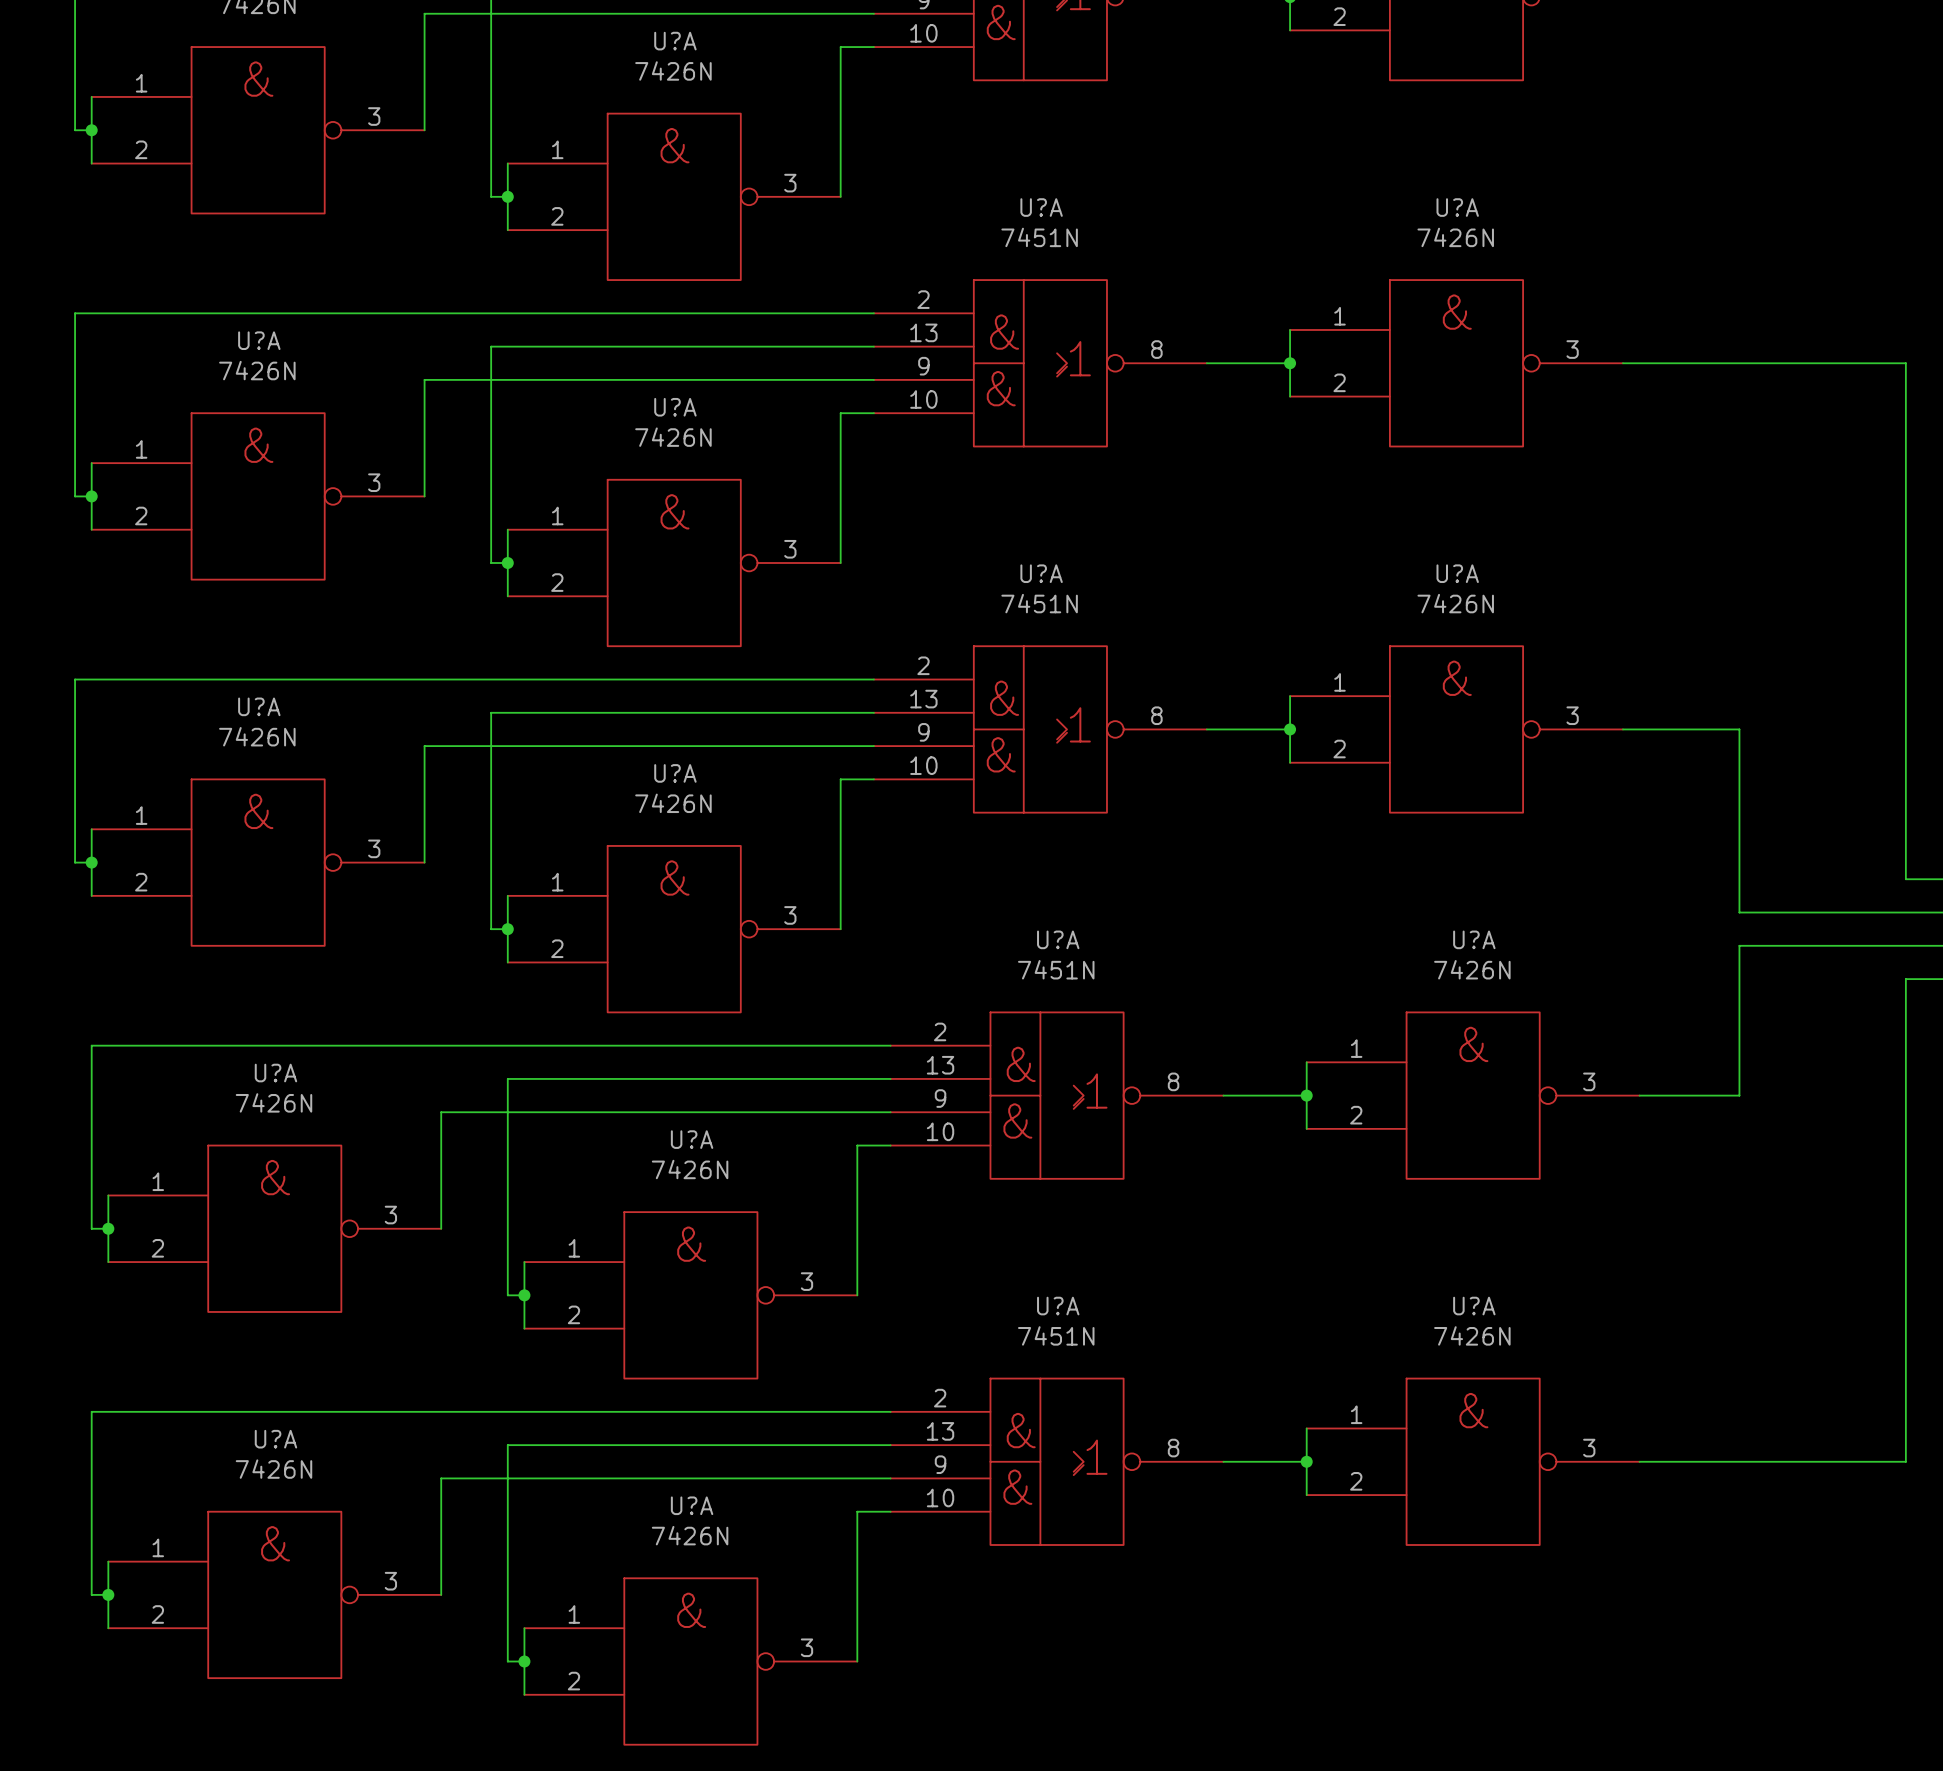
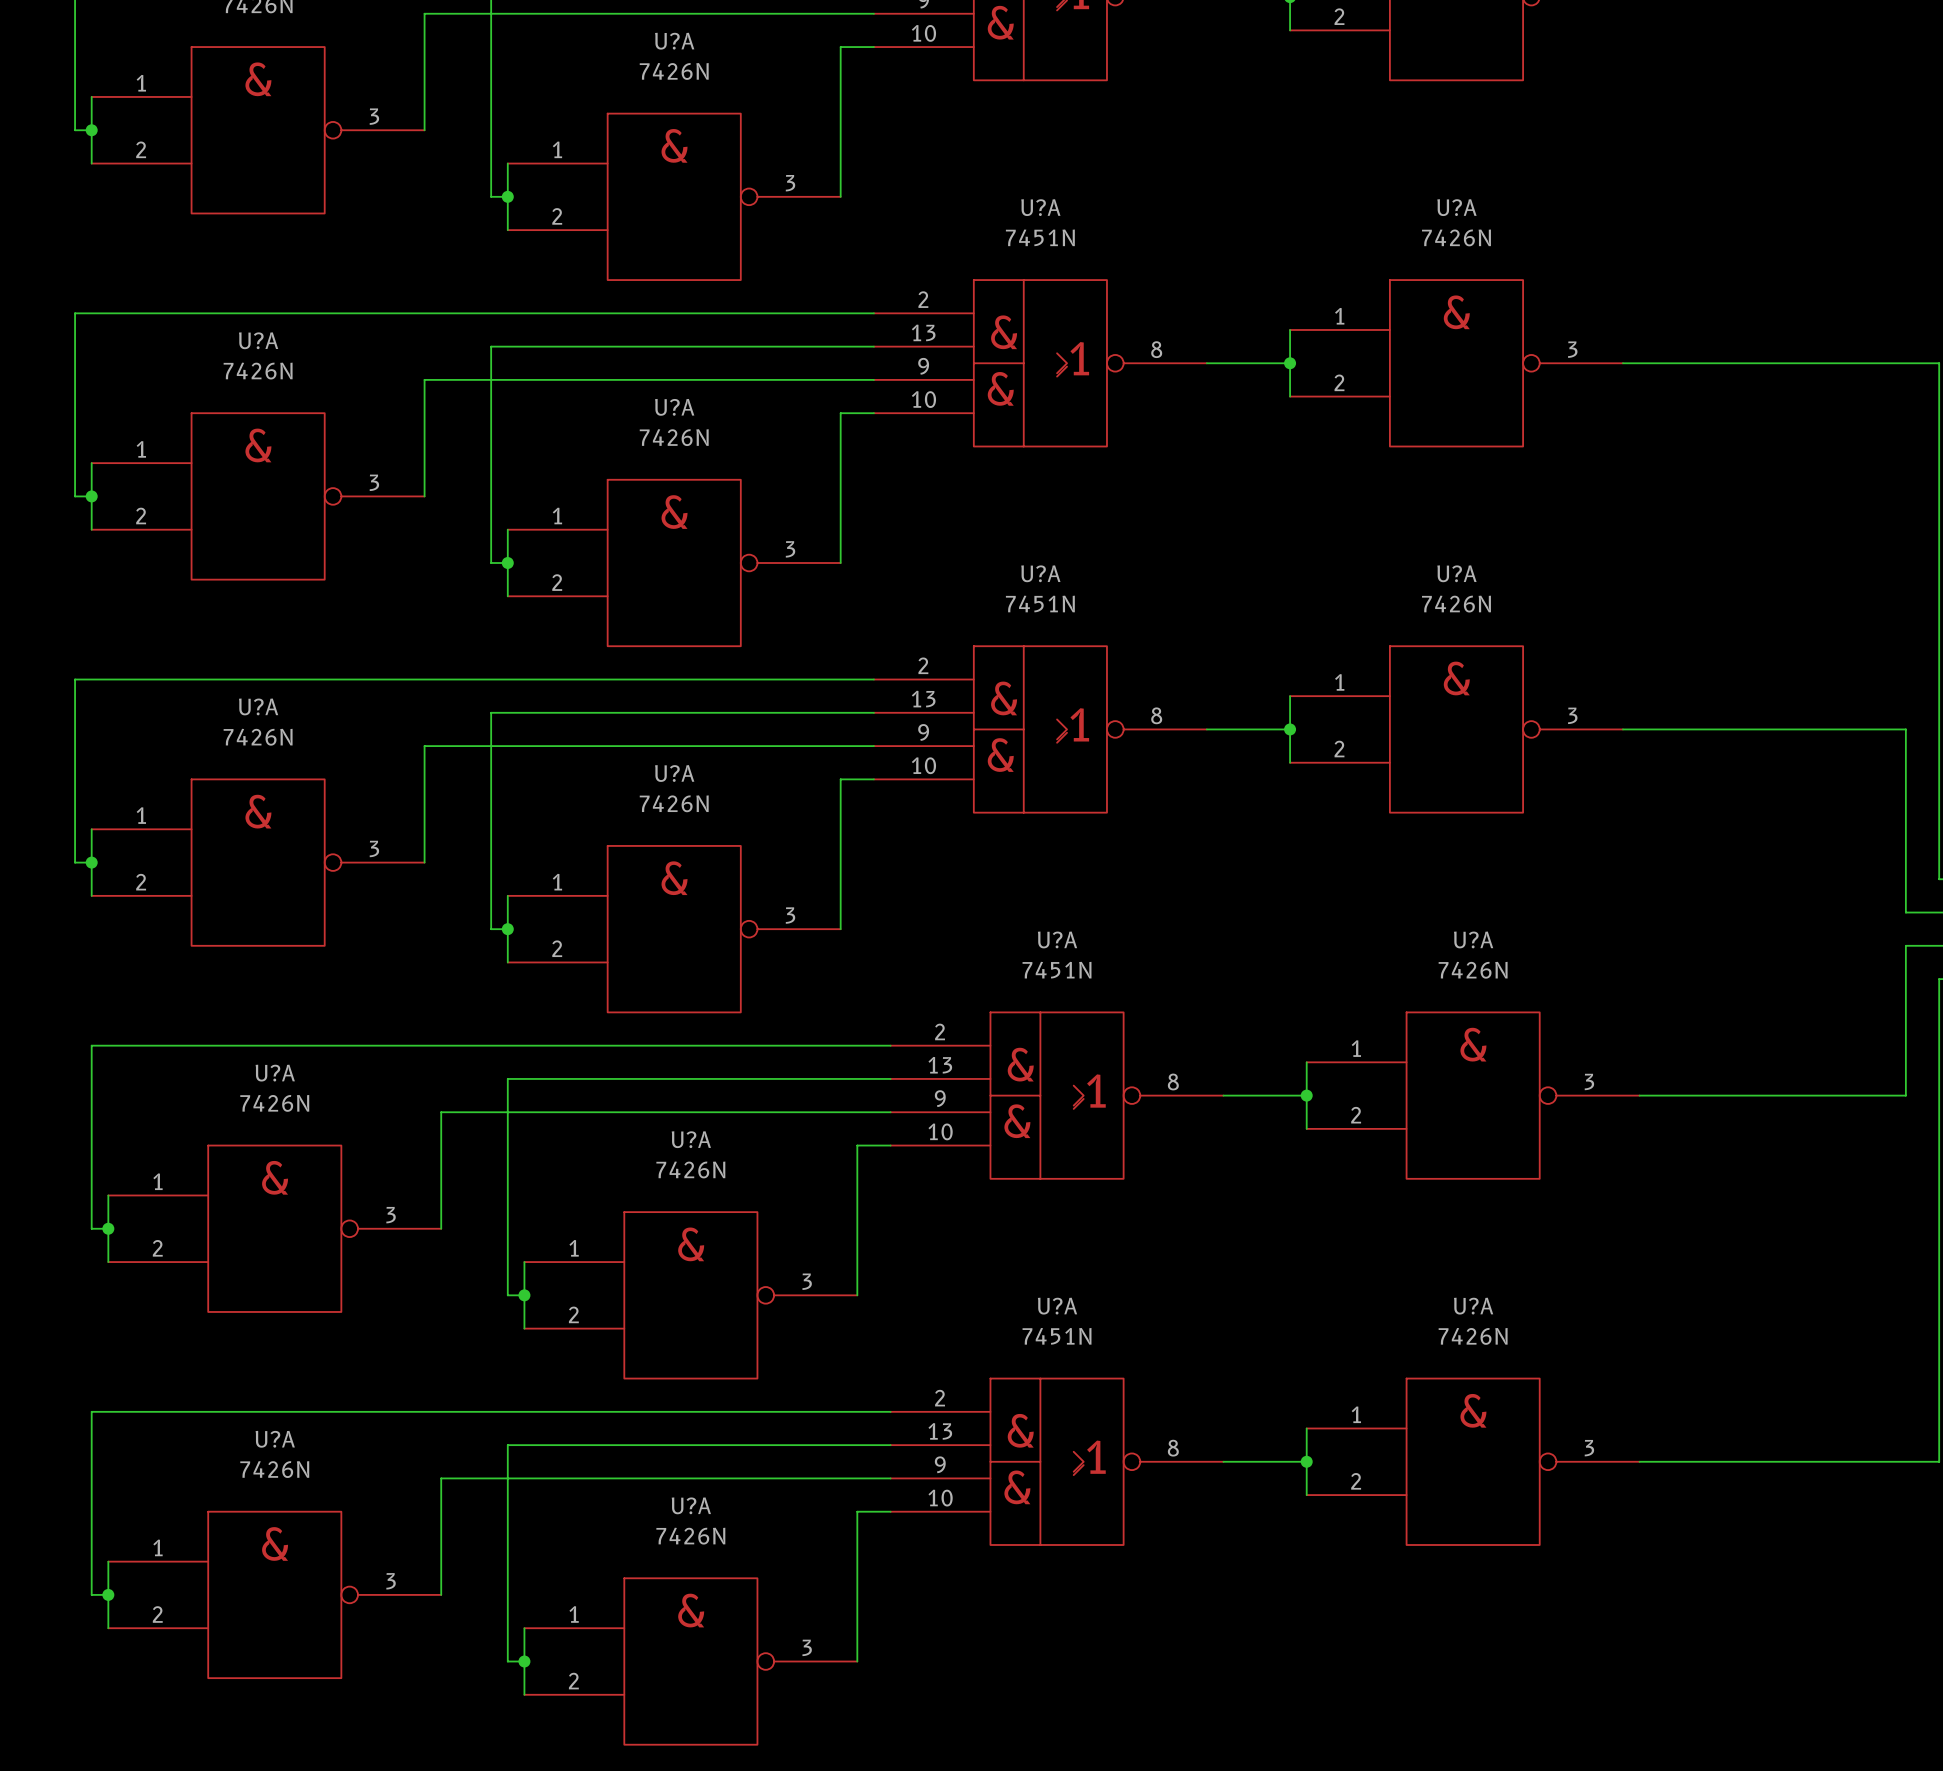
wire: (1905, 363) (1905, 729) -> (1905, 363) (1939, 363) (1939, 879)
wire: (1739, 729) (1739, 912) (1905, 912) -> (1739, 729) (1905, 729)
wire: (1905, 879) (1939, 879) -> (1905, 879) (1905, 912)
wire: (1905, 945) (1739, 945) (1739, 1095) -> (1905, 1095) (1739, 1095)
wire: (1905, 979) (1939, 979) -> (1905, 979) (1905, 945)
wire: (1905, 1095) (1905, 1461) -> (1939, 979) (1939, 1461) (1905, 1461)

